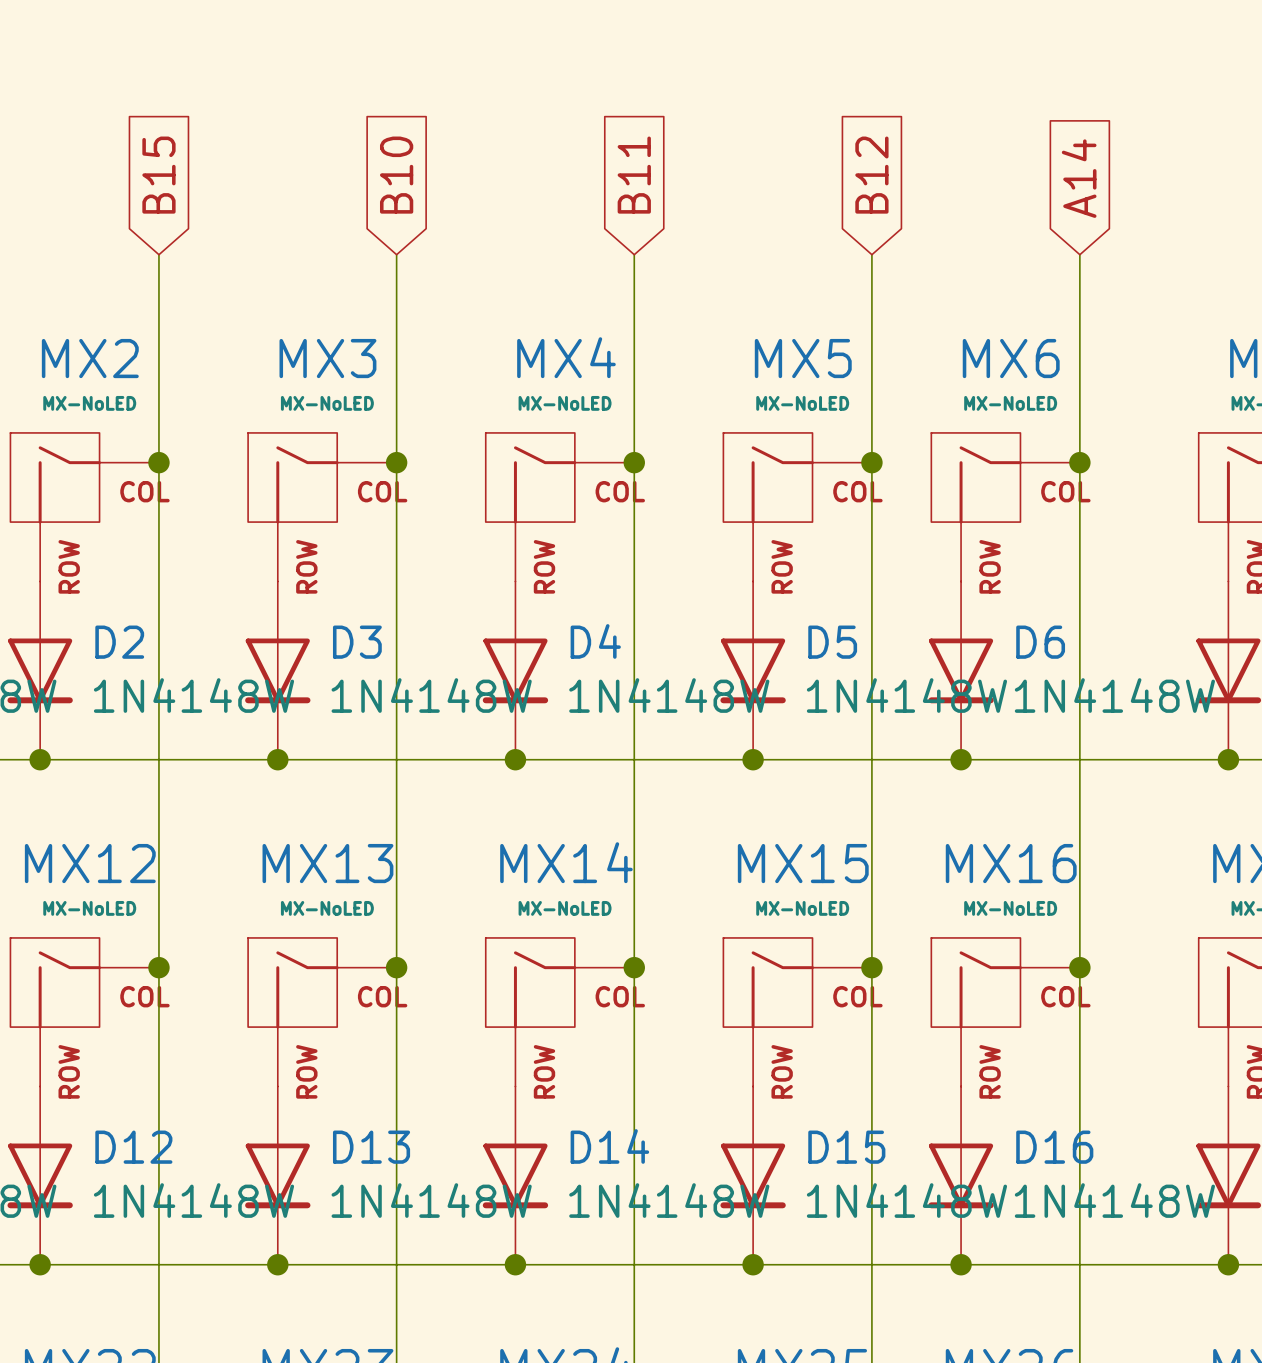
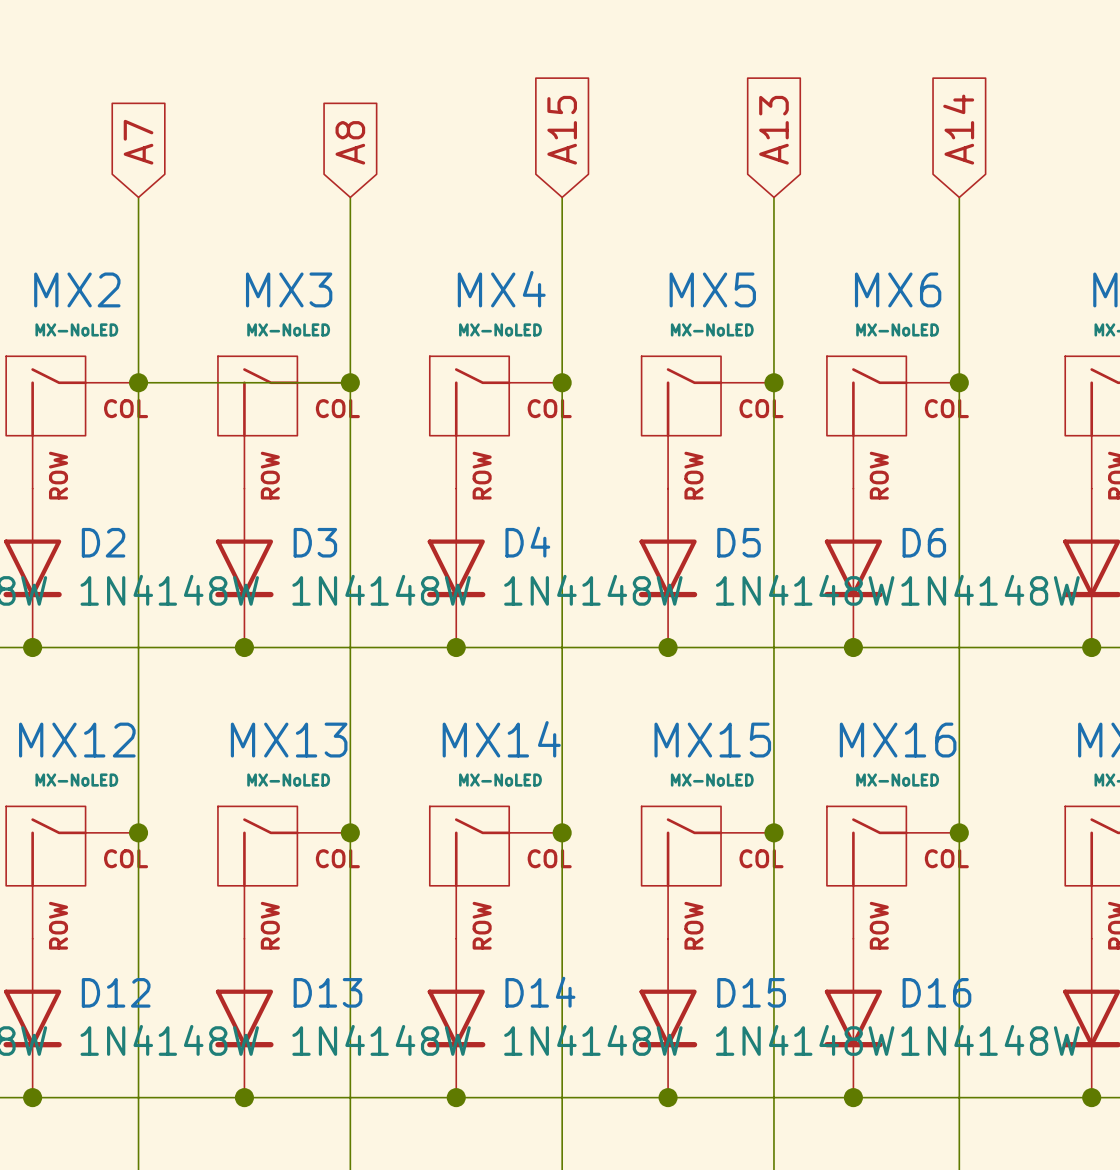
global label: B15 (158, 175) -> A7 (138, 142)
global label: B10 (396, 175) -> A8 (350, 142)
global label: B11 (634, 175) -> A15 (562, 130)
global label: B12 (871, 175) -> A13 (773, 130)
wire: none -> (138, 382) (350, 382)

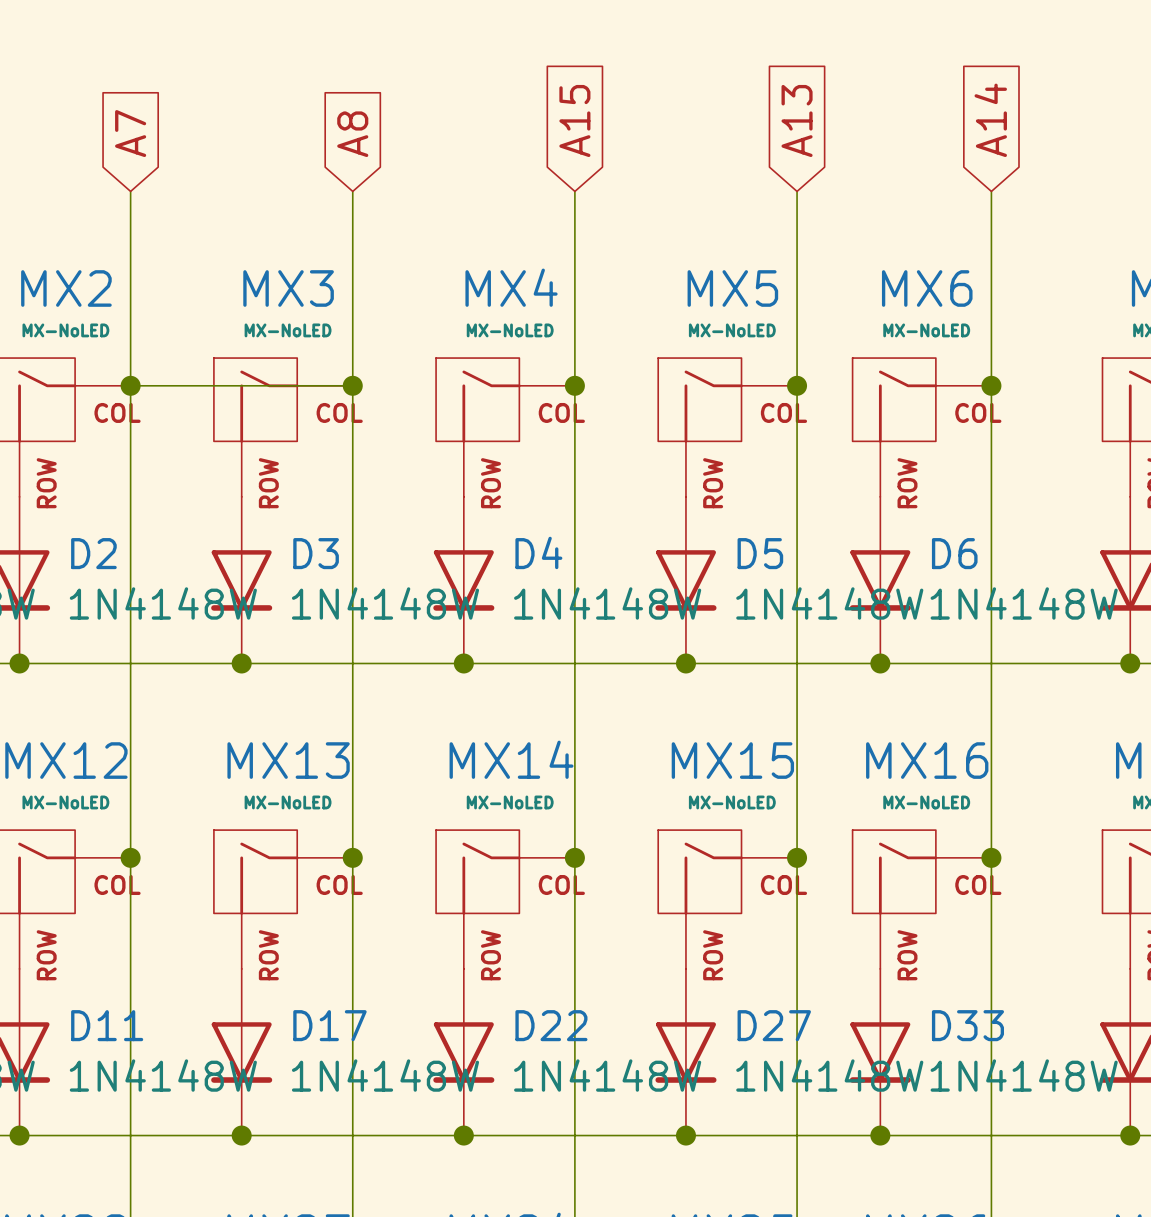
D12 name: D12 (116, 992) -> D11 (107, 1025)
D13 name: D13 (327, 992) -> D17 (329, 1025)
D14 name: D14 (540, 992) -> D22 (551, 1025)
D15 name: D15 (751, 992) -> D27 (774, 1025)
D16 name: D16 (936, 992) -> D33 (967, 1025)

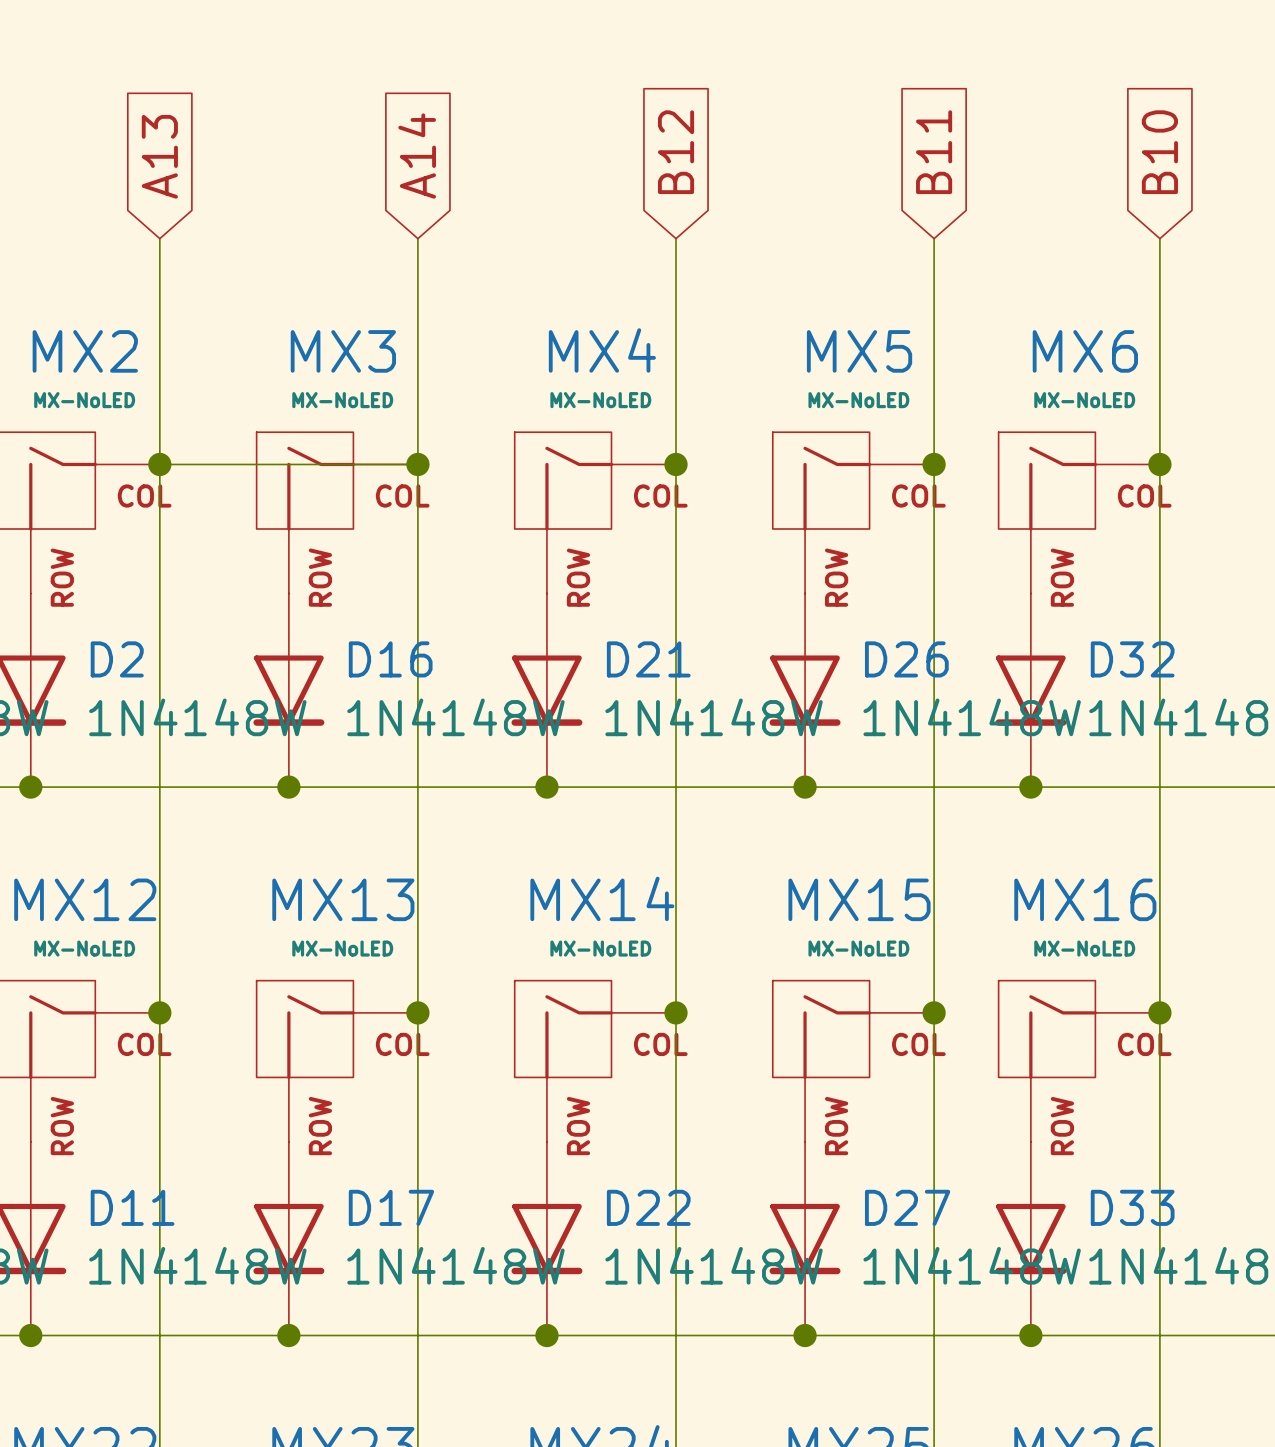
global label: A15 (574, 120) -> B12 (676, 152)
global label: A13 (797, 120) -> B11 (934, 152)
global label: A14 (990, 120) -> B10 (1159, 152)
global label: A7 (130, 133) -> A13 (159, 156)
global label: A8 (352, 134) -> A14 (417, 156)
D4 name: D4 (538, 552) -> D21 (648, 659)
D3 name: D3 (316, 553) -> D16 (390, 659)
D5 name: D5 (760, 553) -> D26 (906, 659)
D6 name: D6 (954, 553) -> D32 (1132, 659)

